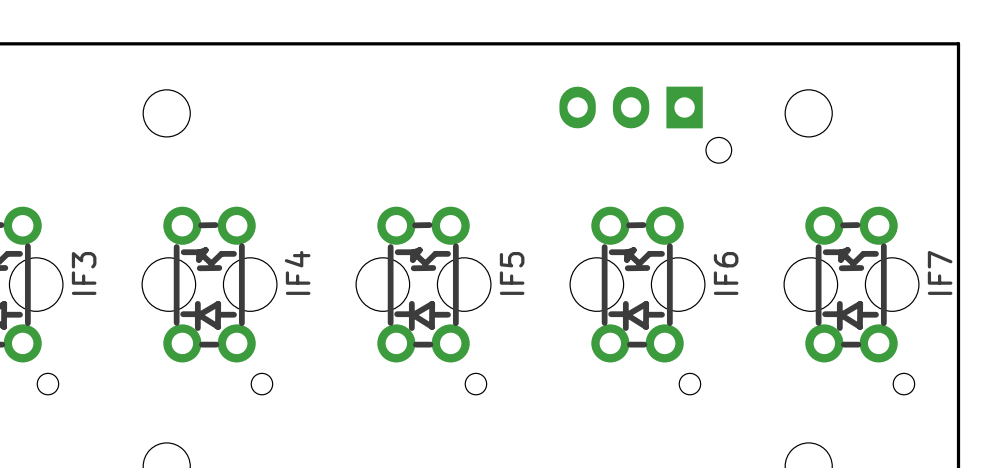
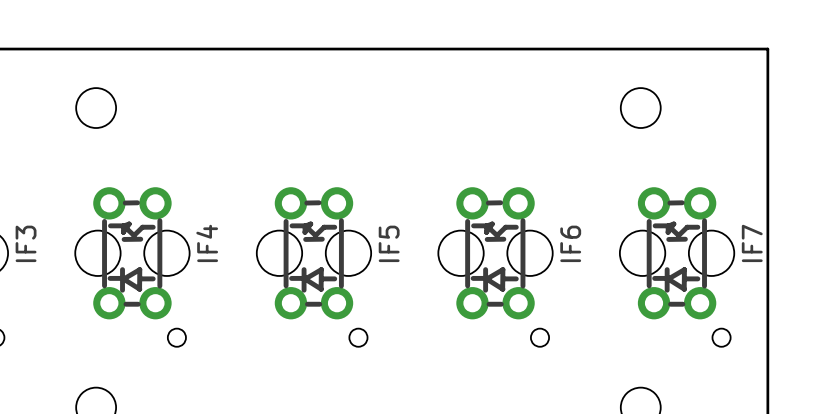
part: (645, 124) -> none

